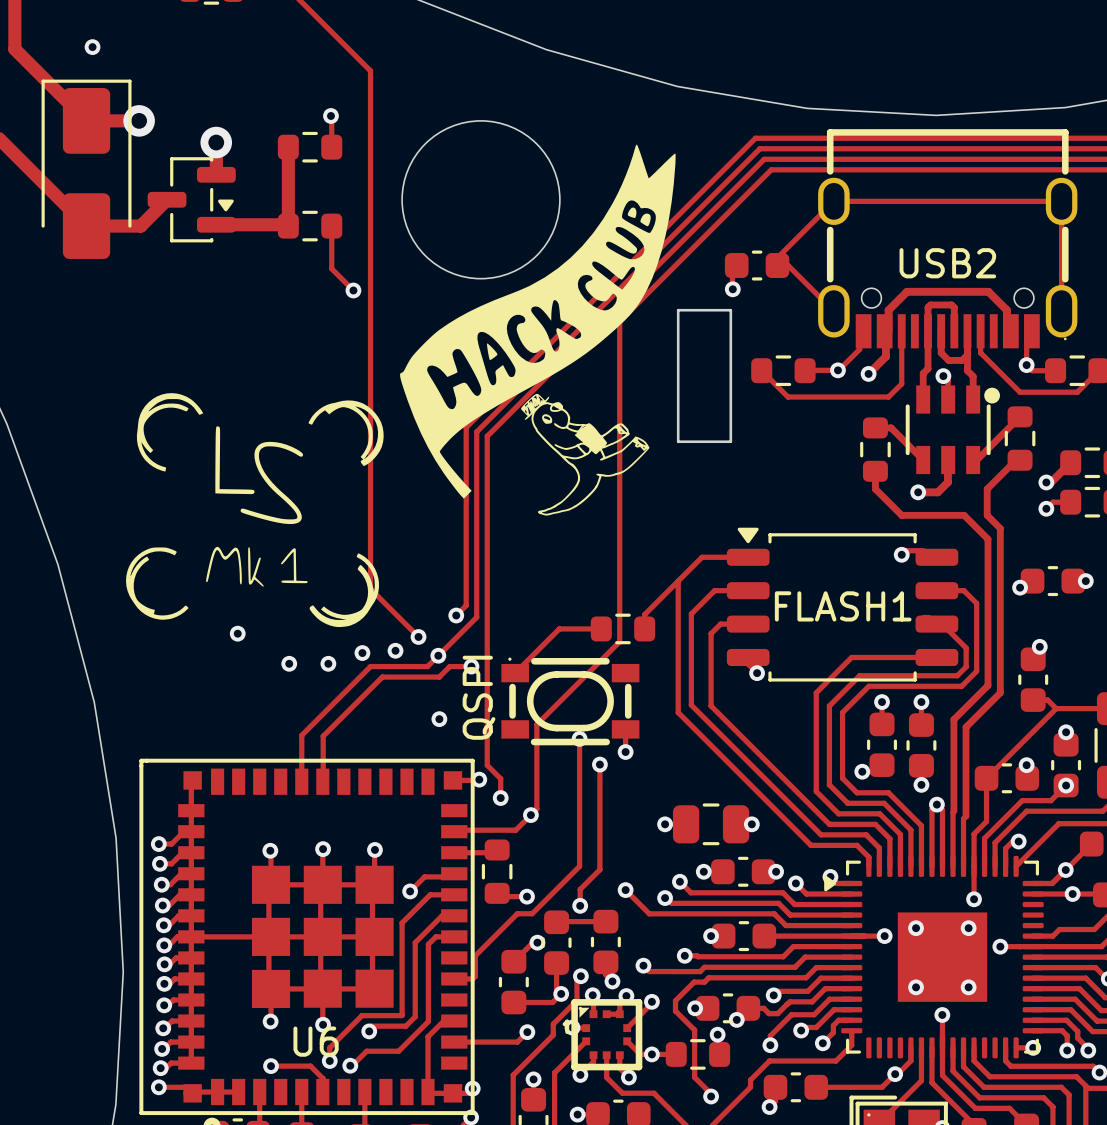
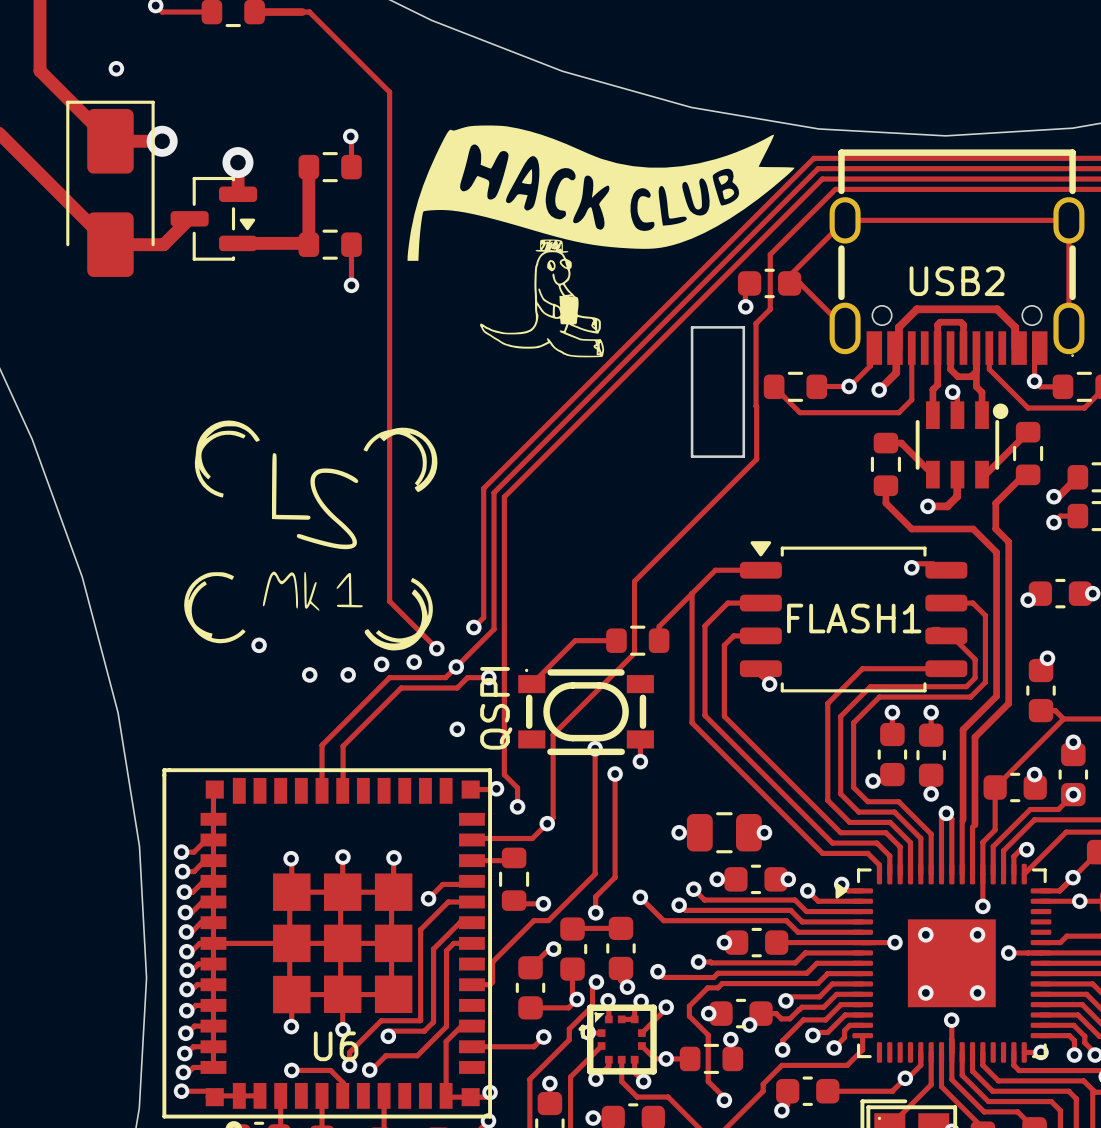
drawing: none -> [407, 125, 795, 358]
round board edge: [401, 120, 561, 280] -> none
track: (802, 138) (755, 138) (466, 427) (466, 474) -> (813, 158) (483, 488)
drawing: [400, 144, 676, 516] -> none
track: (806, 148) (759, 148) (476, 431) (476, 478) -> (818, 168) (494, 492)
track: (810, 159) (764, 159) (487, 436) (487, 482) -> (822, 179) (504, 497)
track: (824, 169) (771, 169) (619, 321) (619, 568) -> (835, 189) (770, 254) (770, 309) (756, 323) (756, 459) (634, 581)
track: (331, 267) (353, 290) -> none
via position: (353, 290) -> (351, 285)
drawing position: (254, 510) -> (310, 535)

